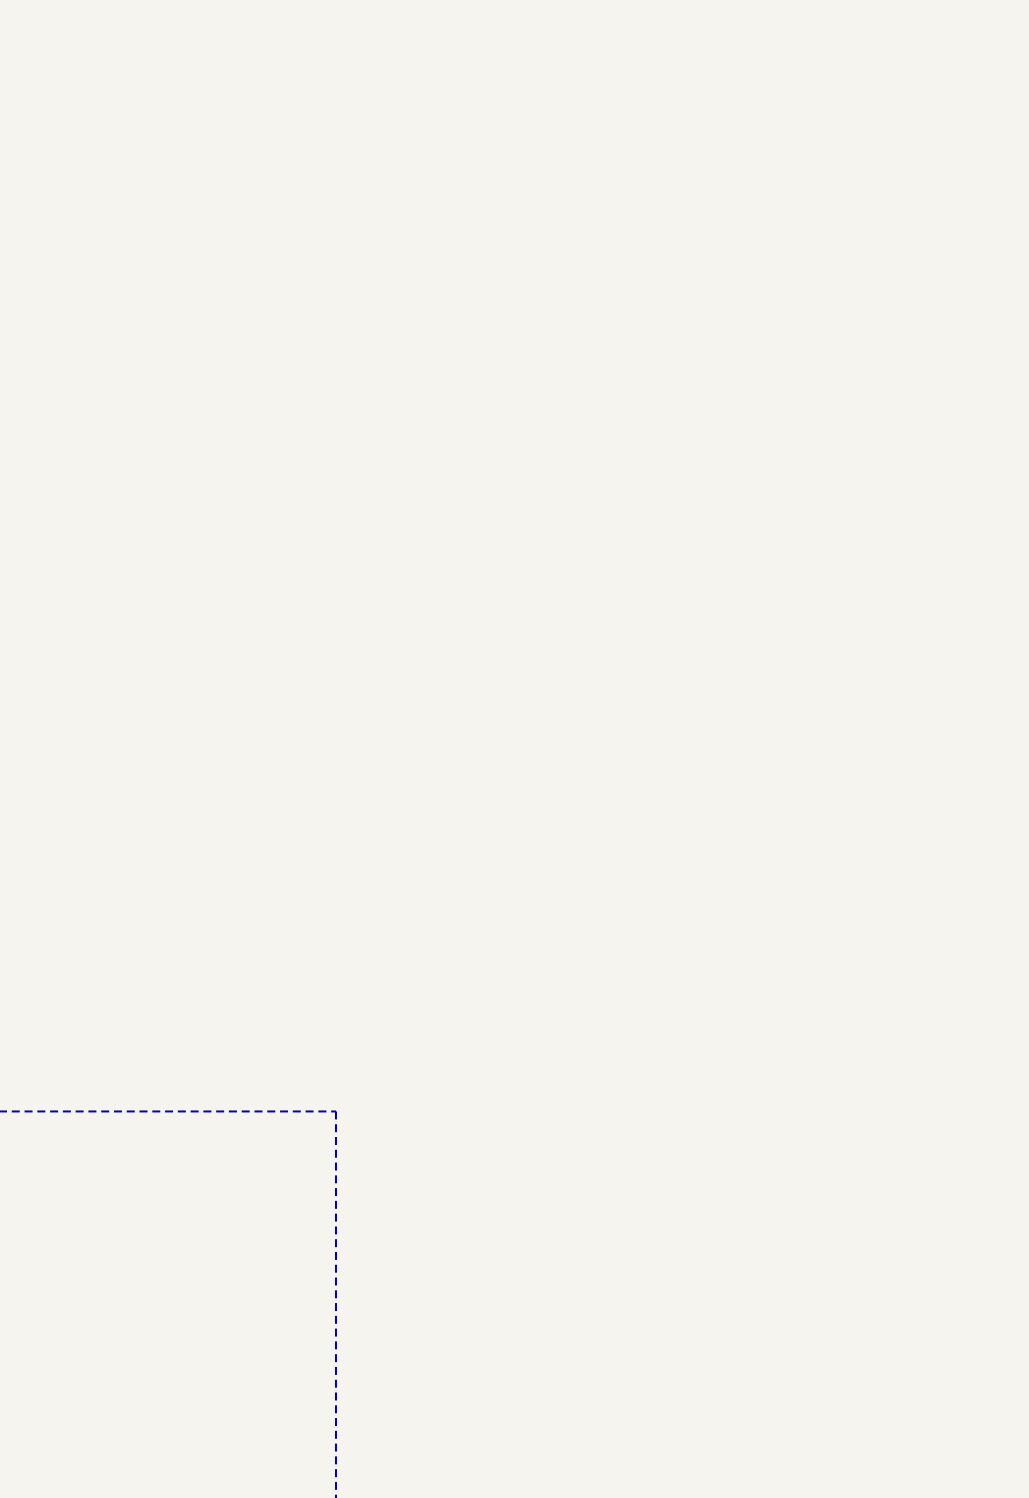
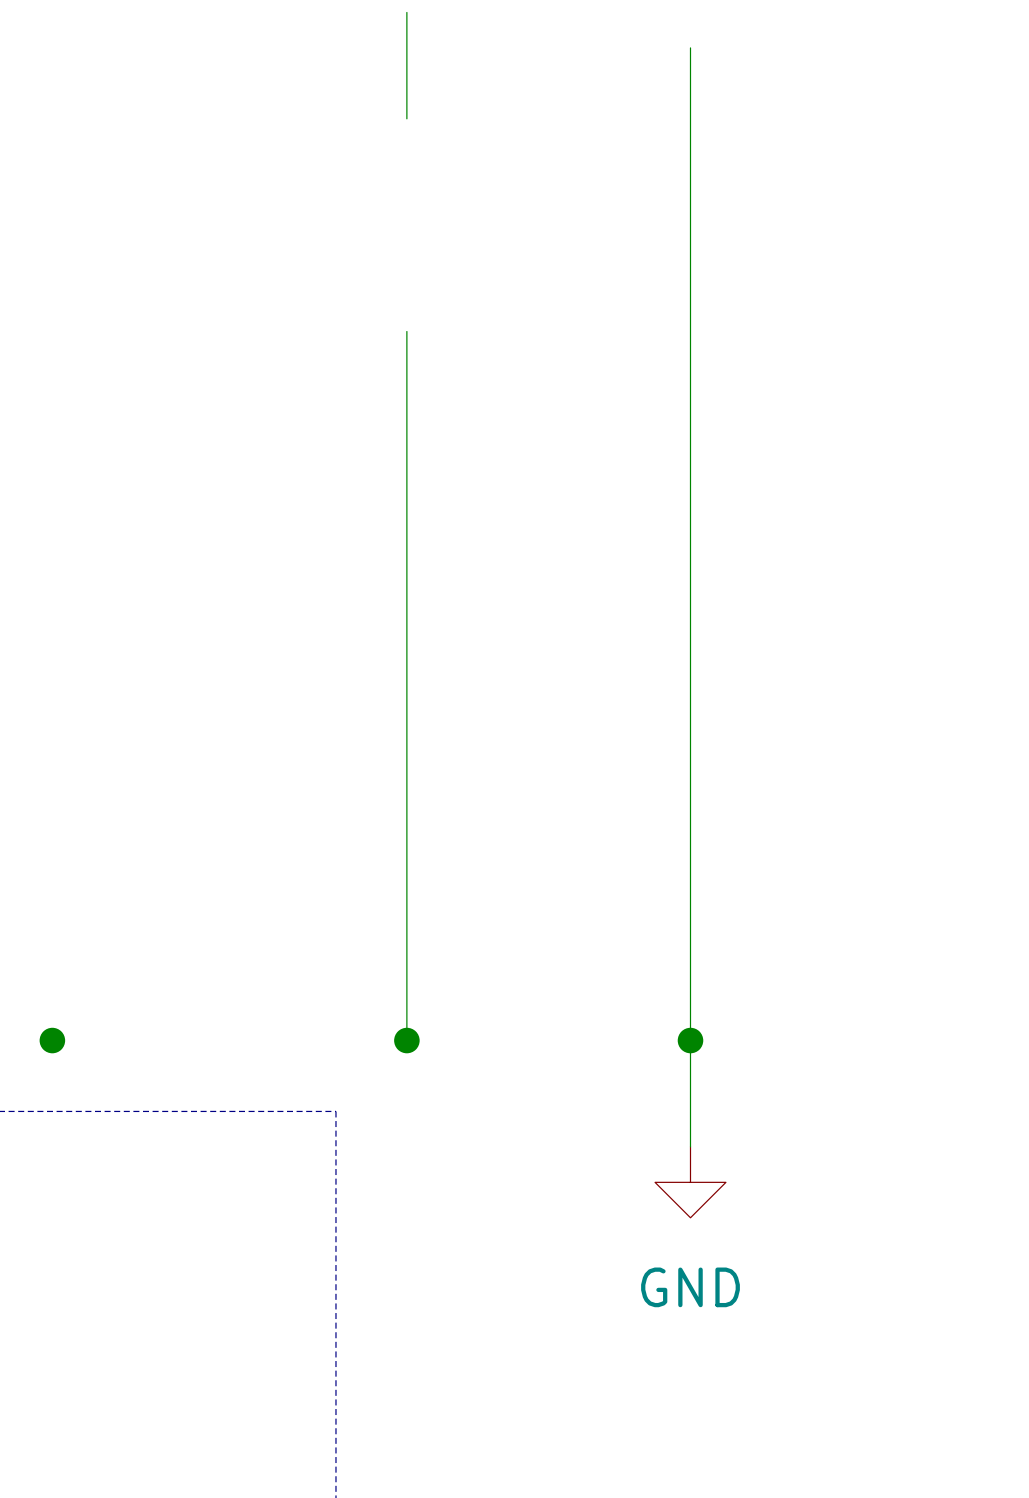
wire: none -> (406, 12) (406, 118)
wire: none -> (690, 47) (690, 1146)
wire: none -> (406, 331) (406, 1040)
junction: none -> (52, 1040)
junction: none -> (406, 1040)
junction: none -> (690, 1040)
power symbol: none -> GND (690, 1182)

